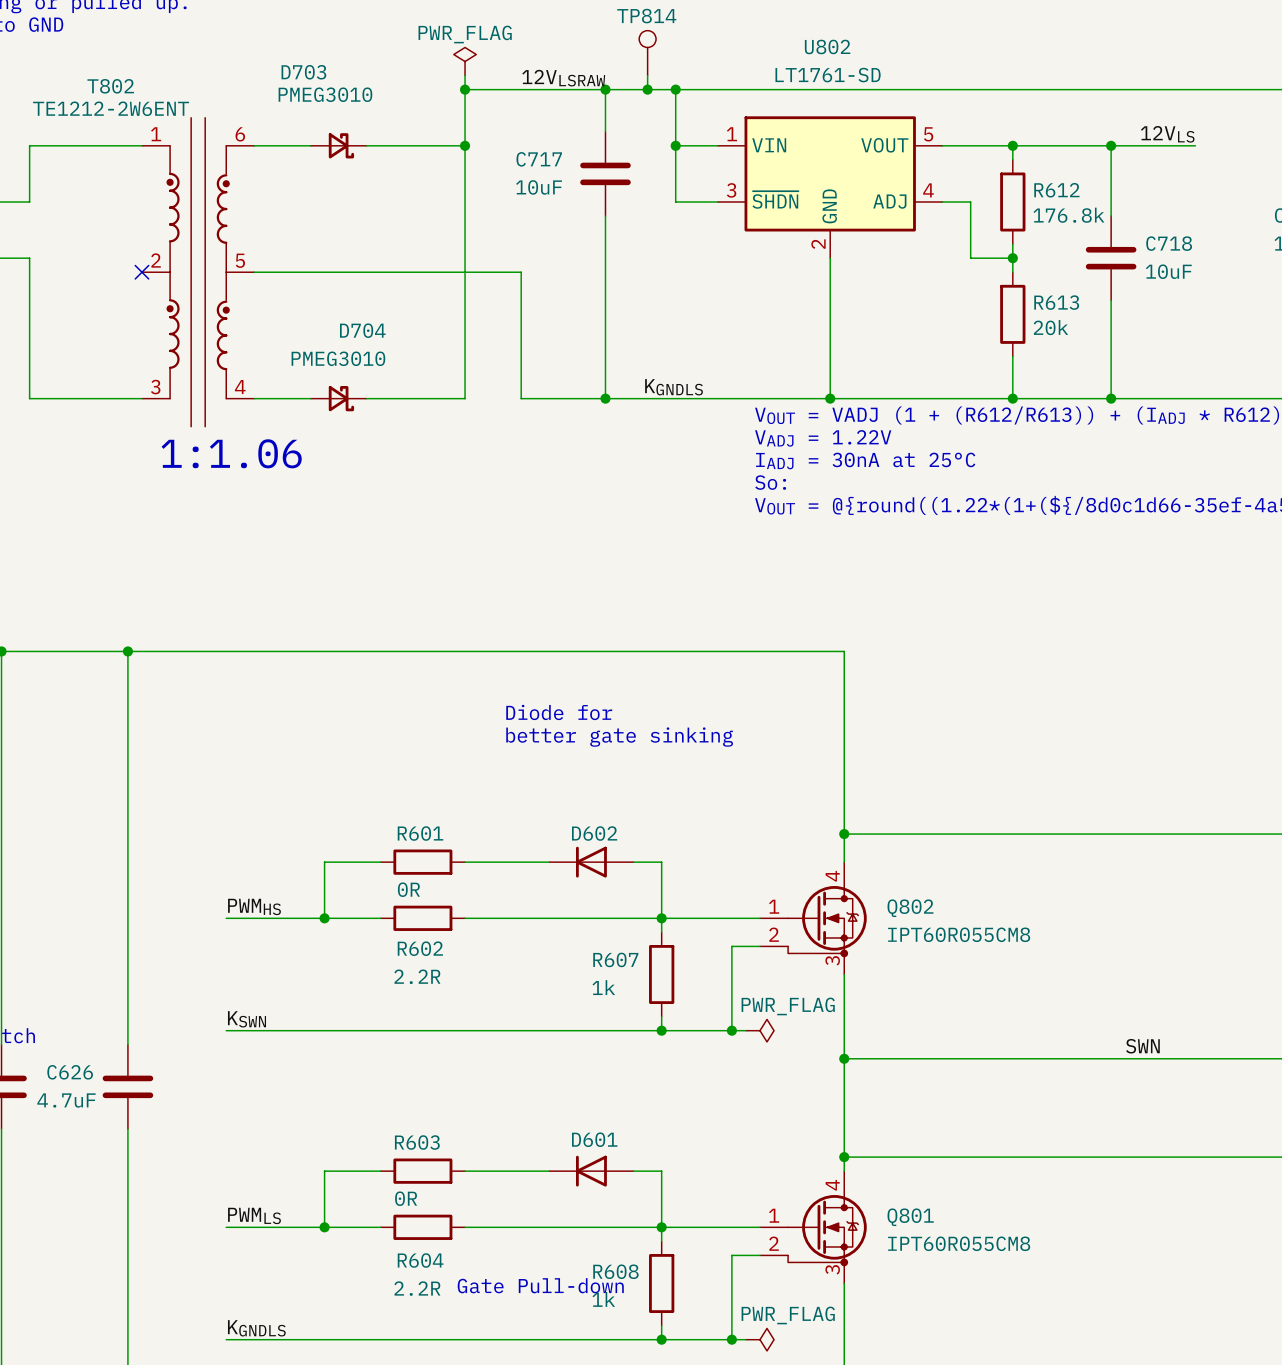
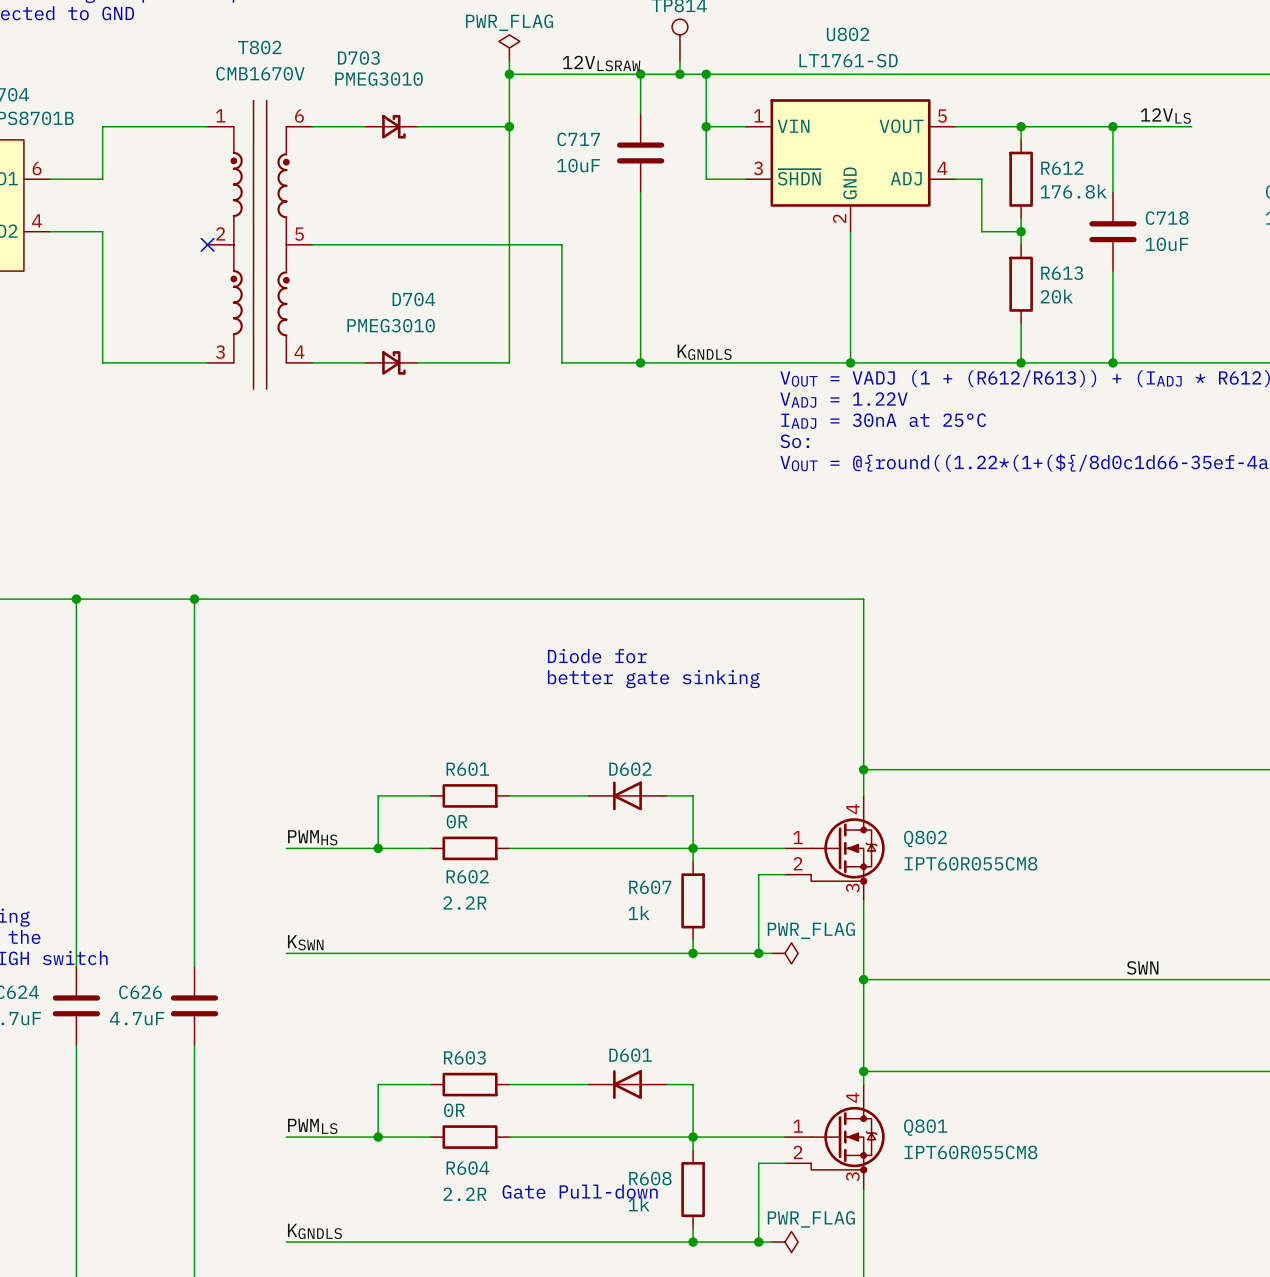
T802 name position: T802 (110, 86) -> T802 (259, 47)
T802 value: TE1212-2W6ENT (111, 108) -> CMB1670V (260, 73)
text: 1:1.06 (231, 453) -> none

